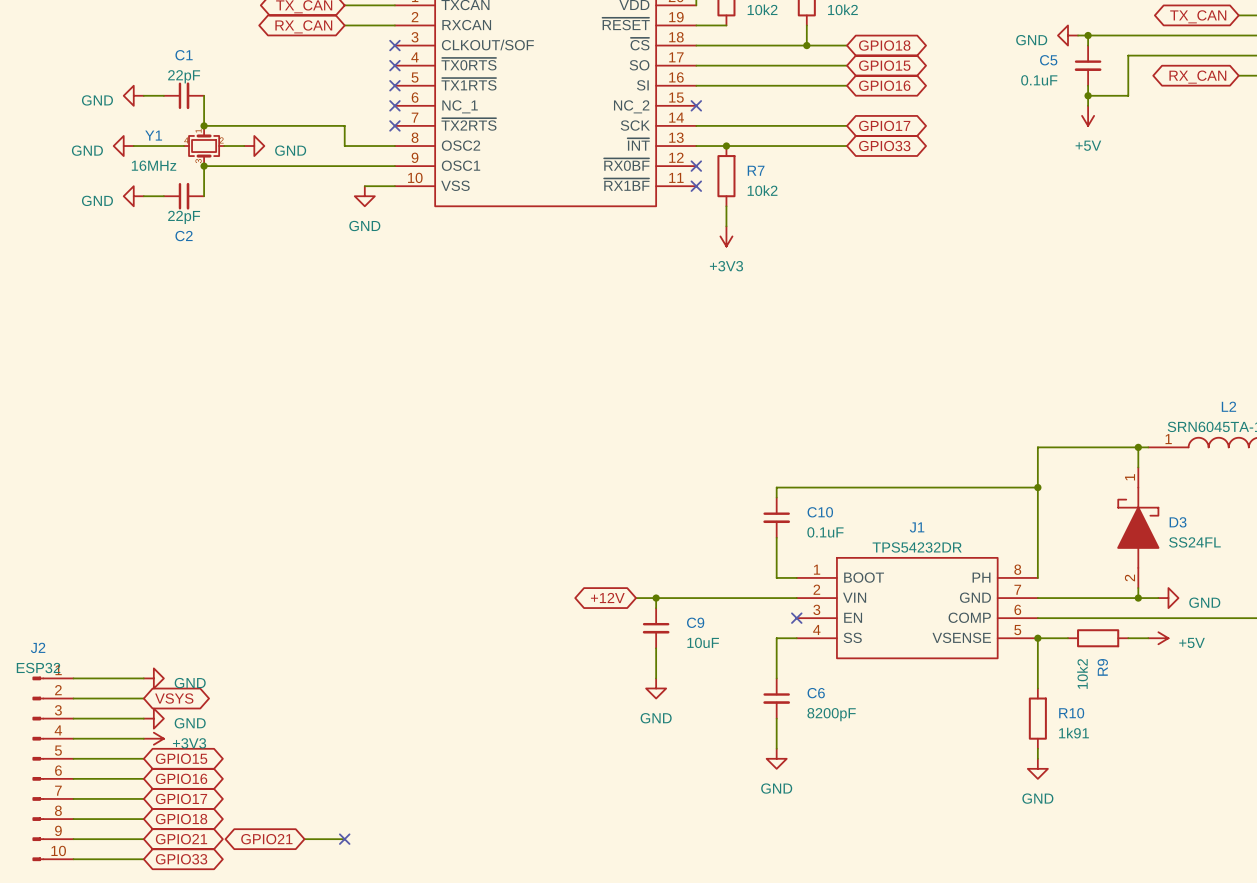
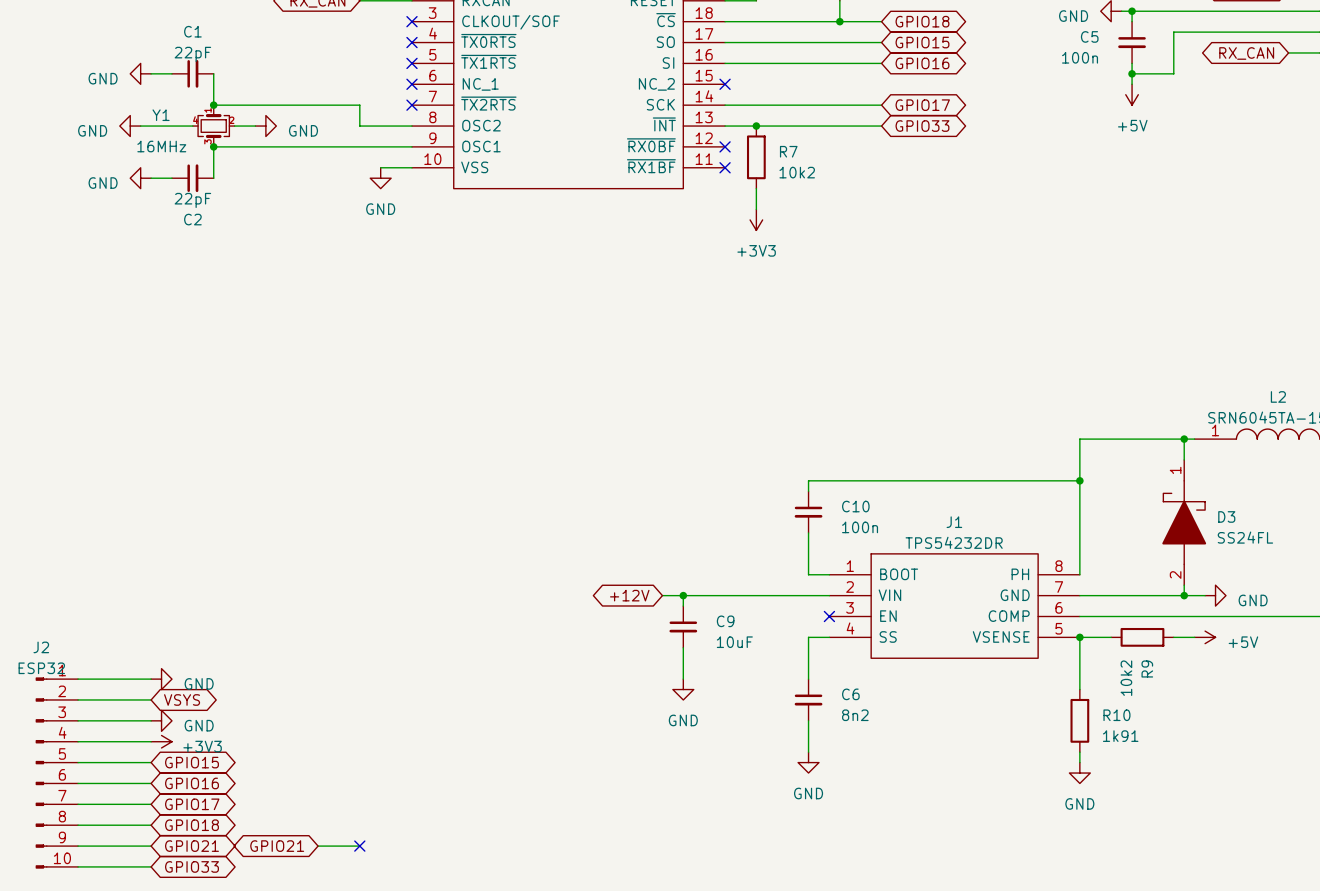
C5 value: 0.1uF (1039, 80) -> 100n (1080, 57)
C10 value: 0.1uF (825, 532) -> 100n (860, 527)
C6 value: 8200pF (831, 714) -> 8n2 (855, 715)

